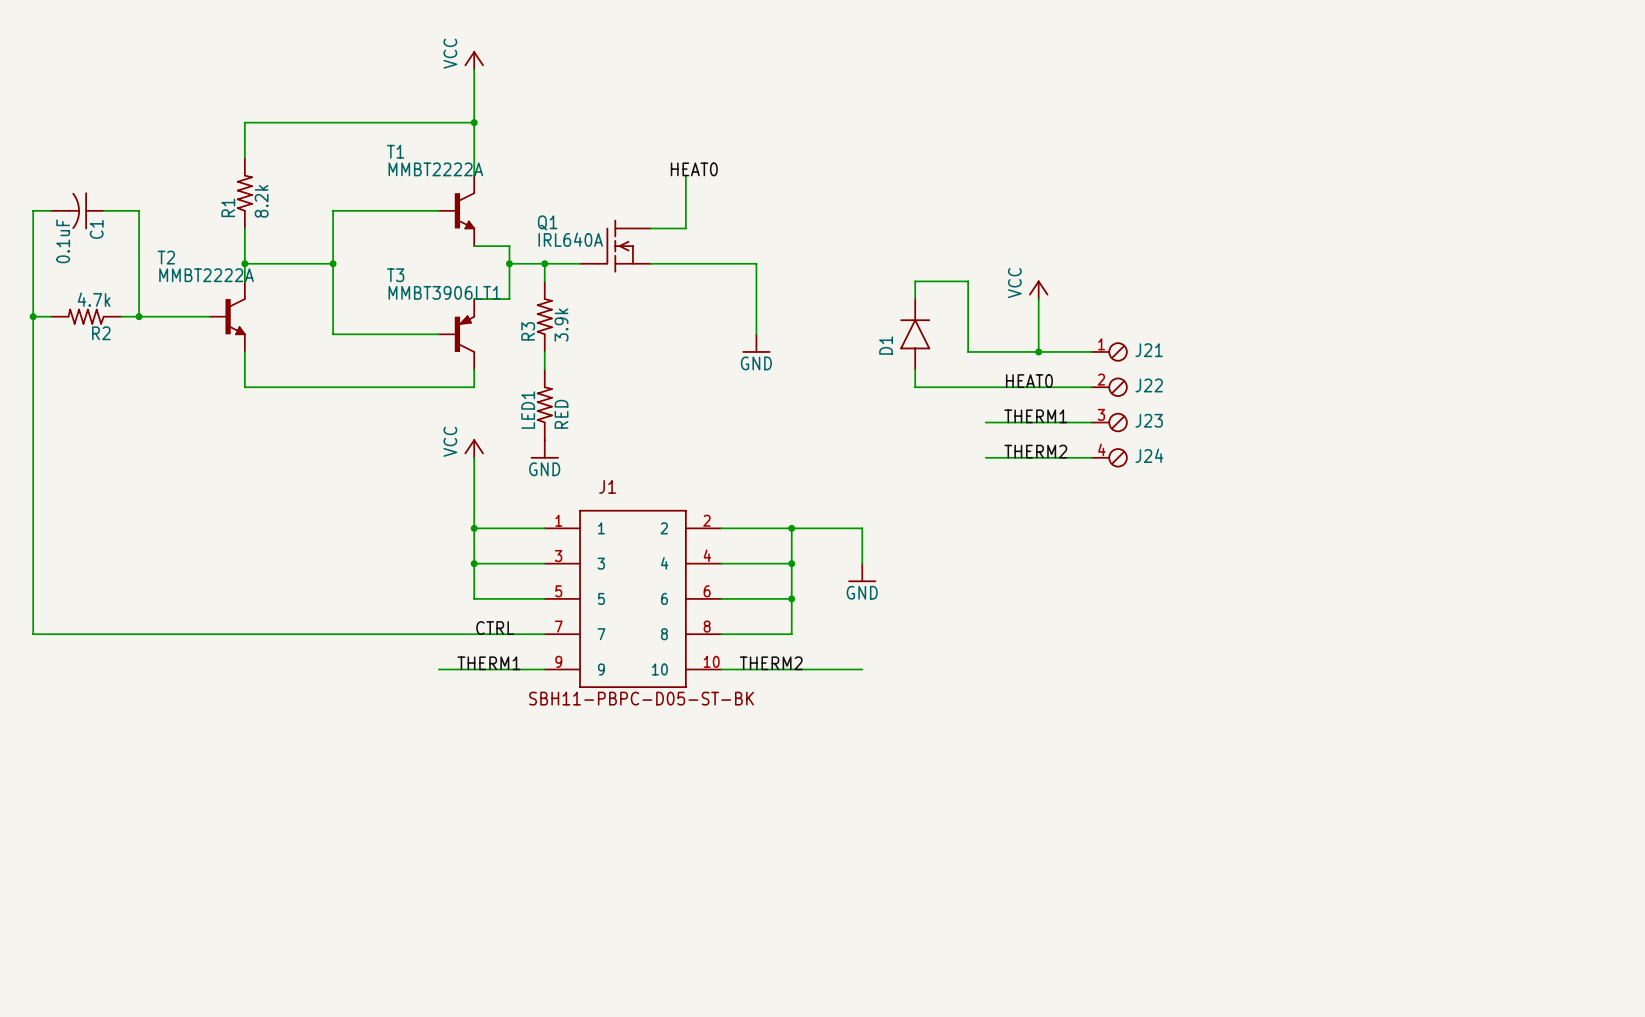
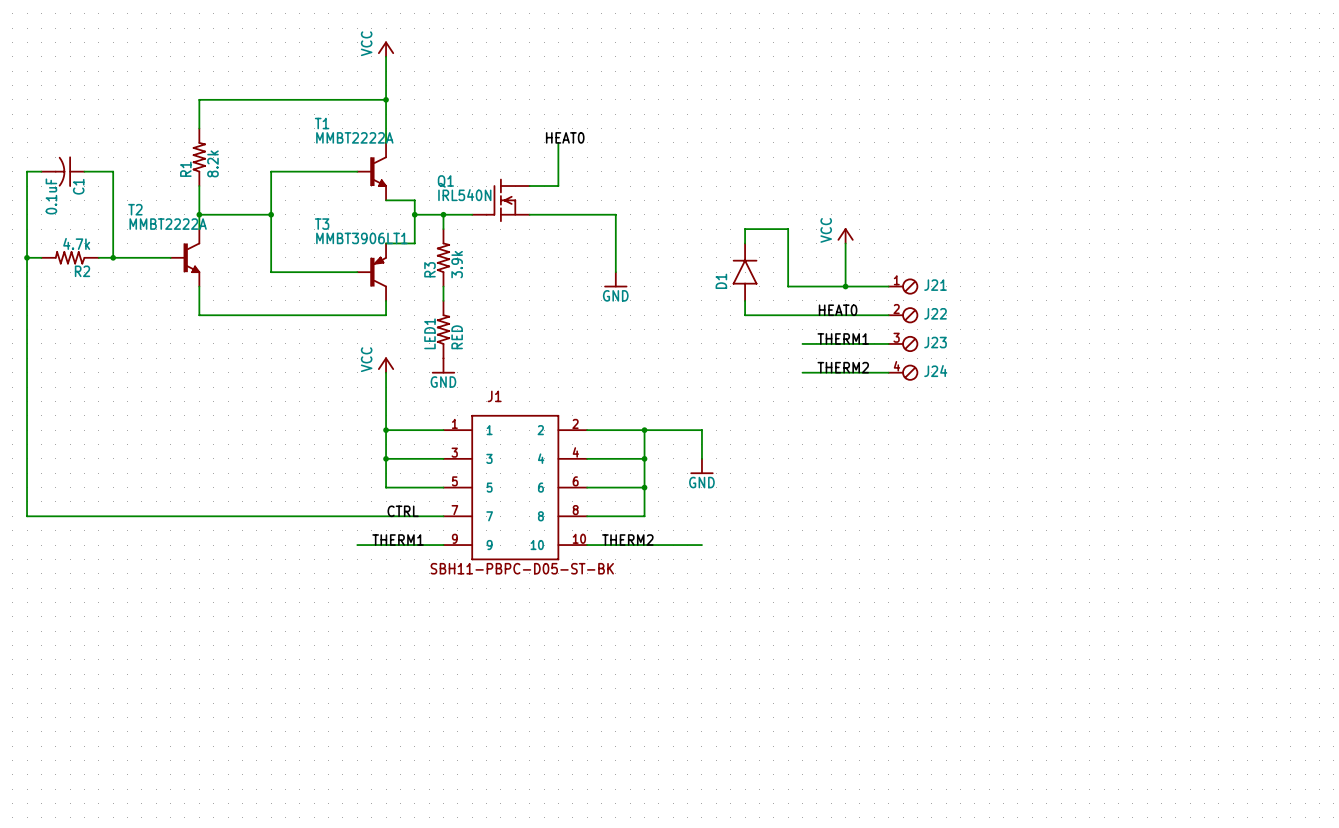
Q1 value: IRL640A (570, 239) -> IRL540N (464, 195)

